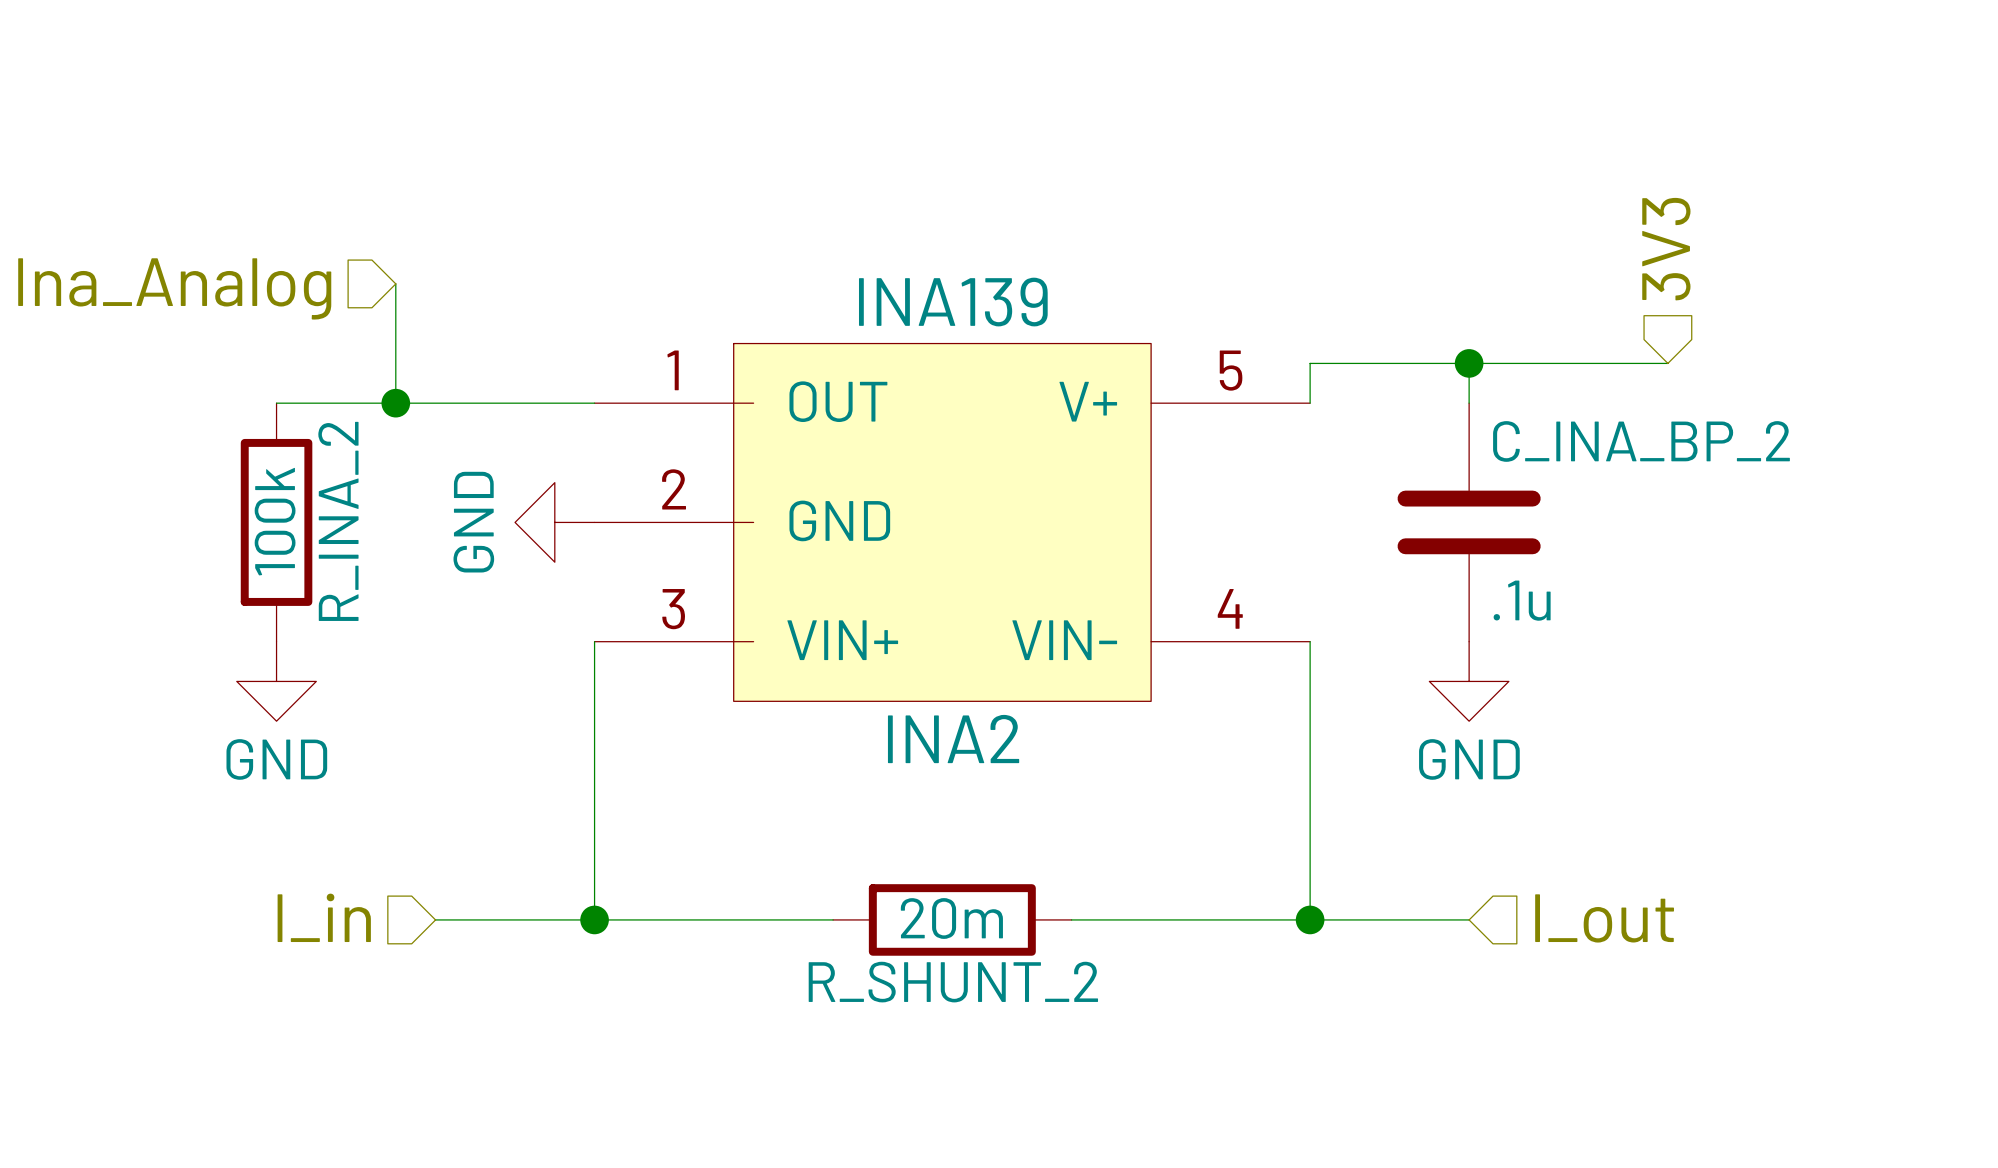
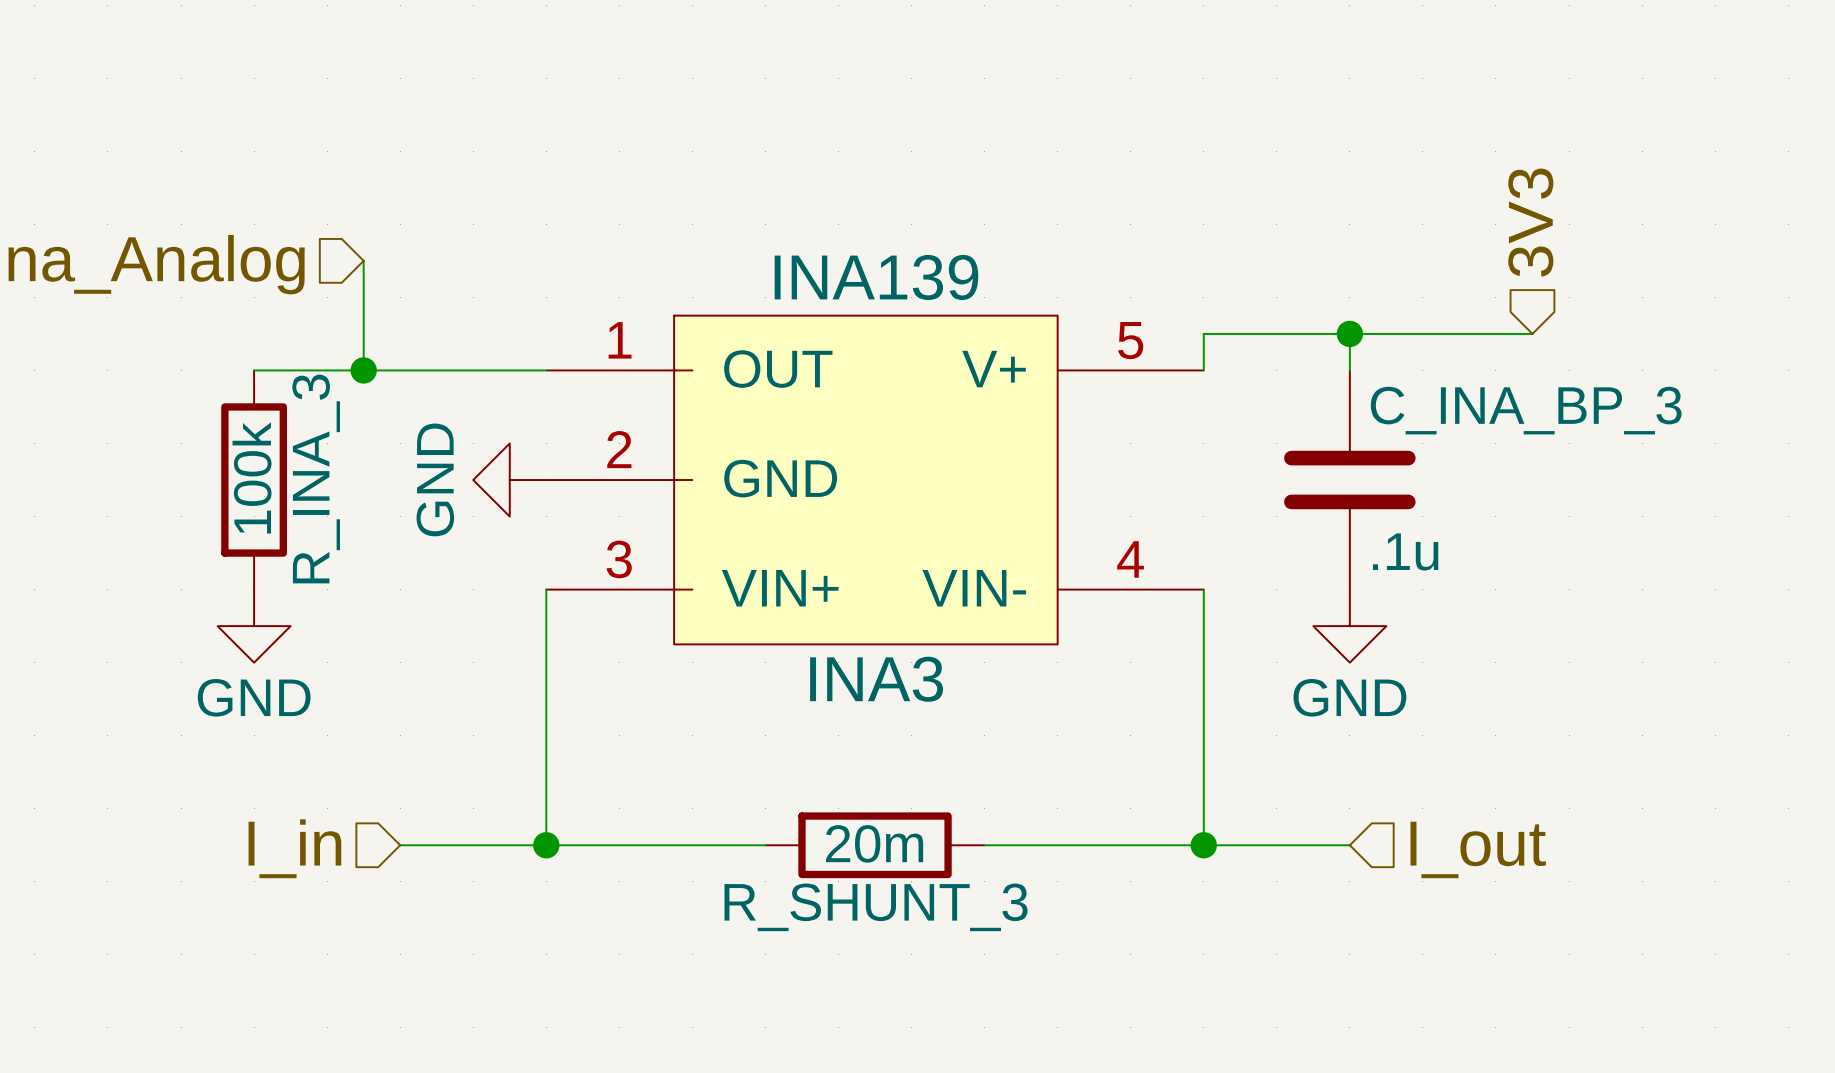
C_INA_BP_2 name: C_INA_BP_2 (1641, 441) -> C_INA_BP_3 (1526, 410)
R_INA_2 name: R_INA_2 (338, 521) -> R_INA_3 (316, 479)
INA2 name: INA2 (953, 739) -> INA3 (876, 679)
R_SHUNT_2 name: R_SHUNT_2 (953, 982) -> R_SHUNT_3 (876, 907)

